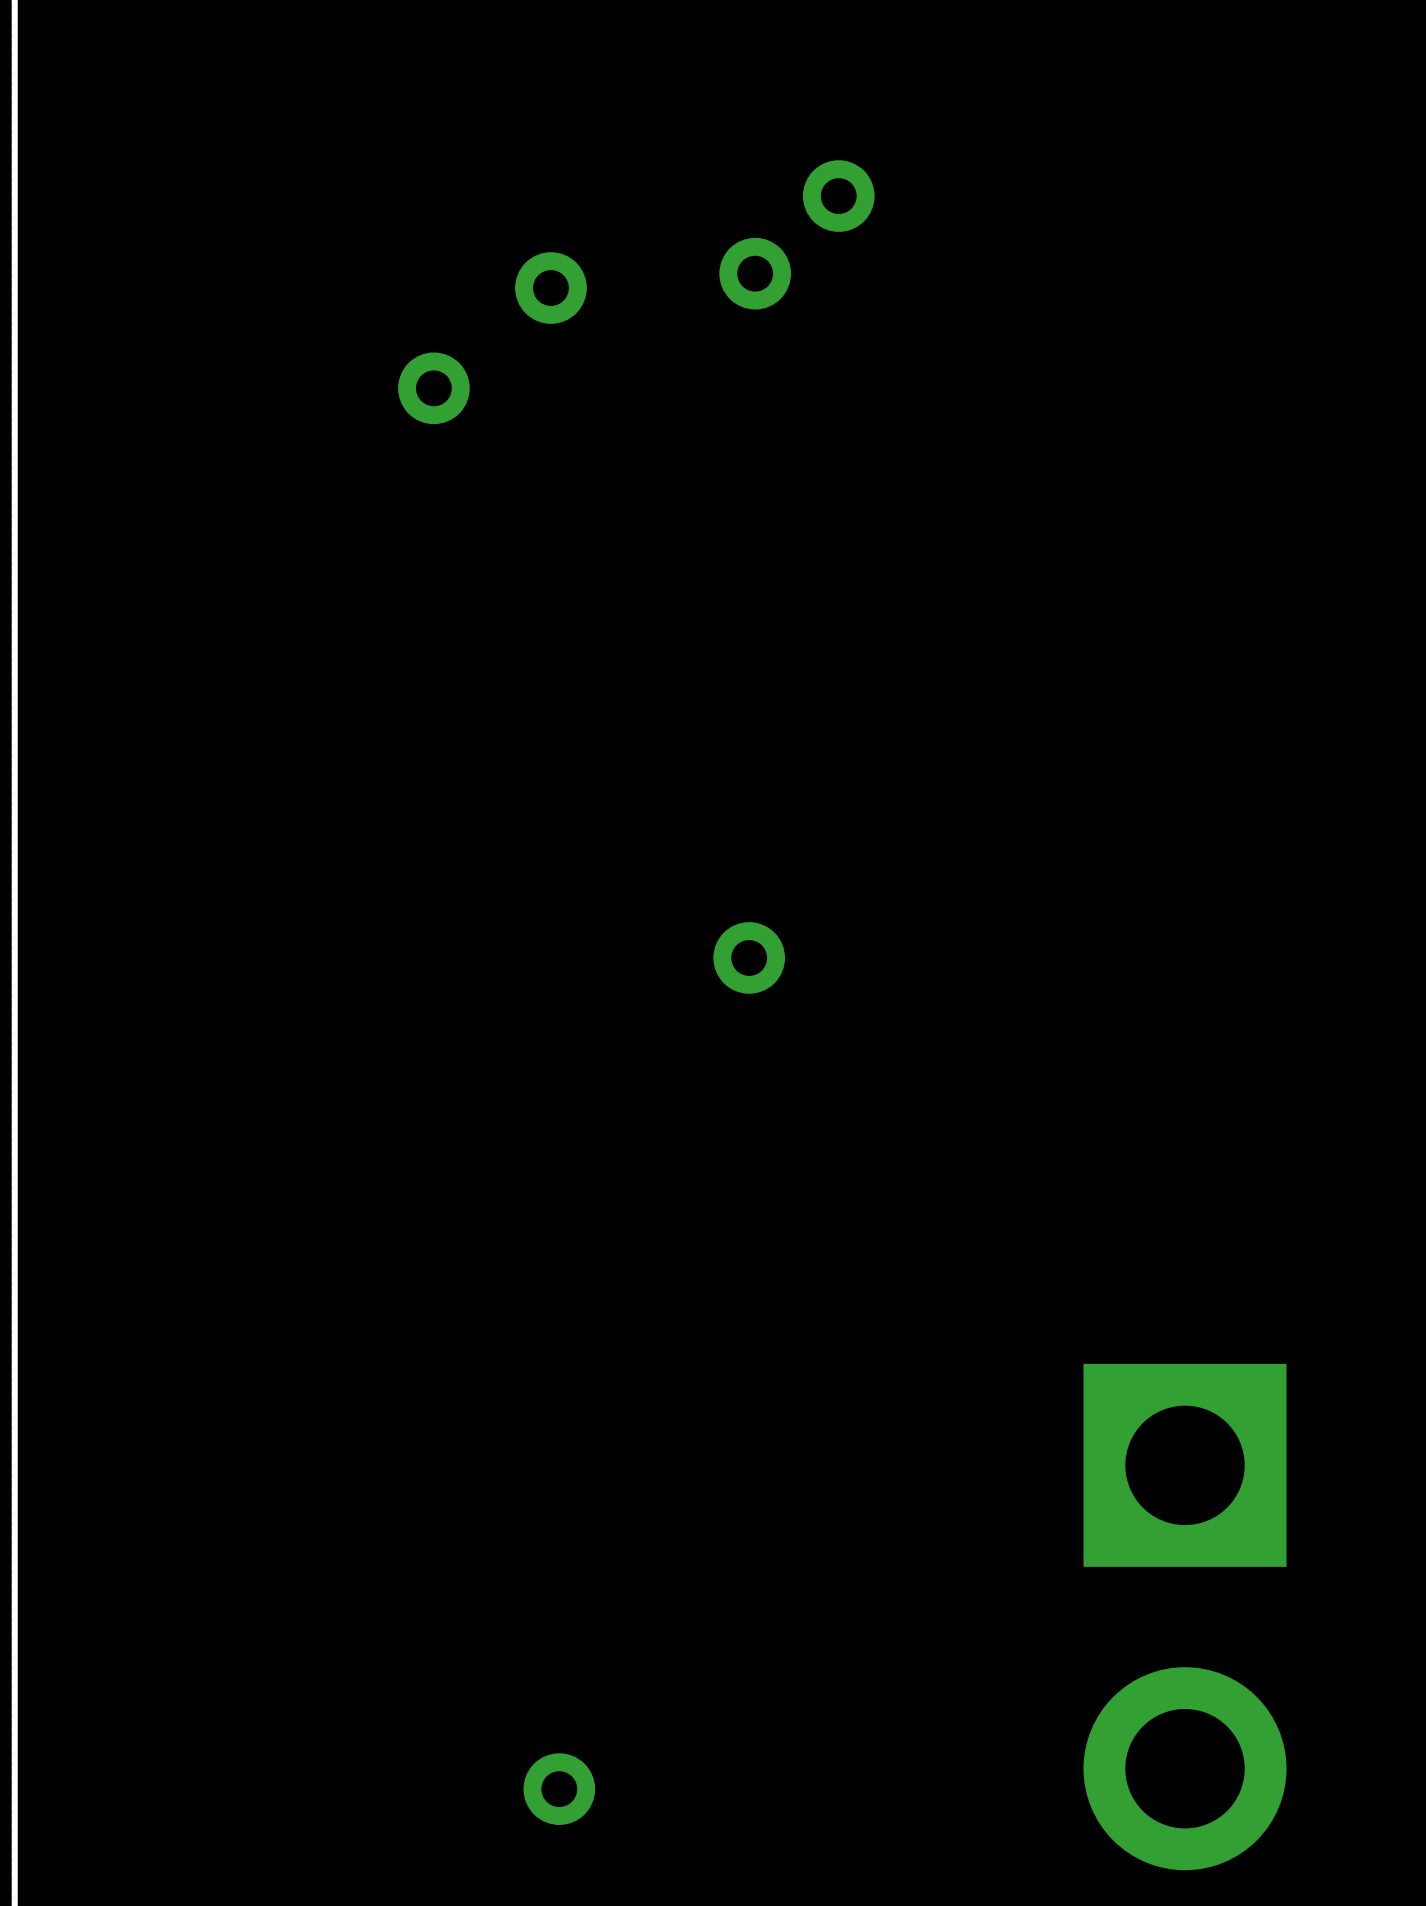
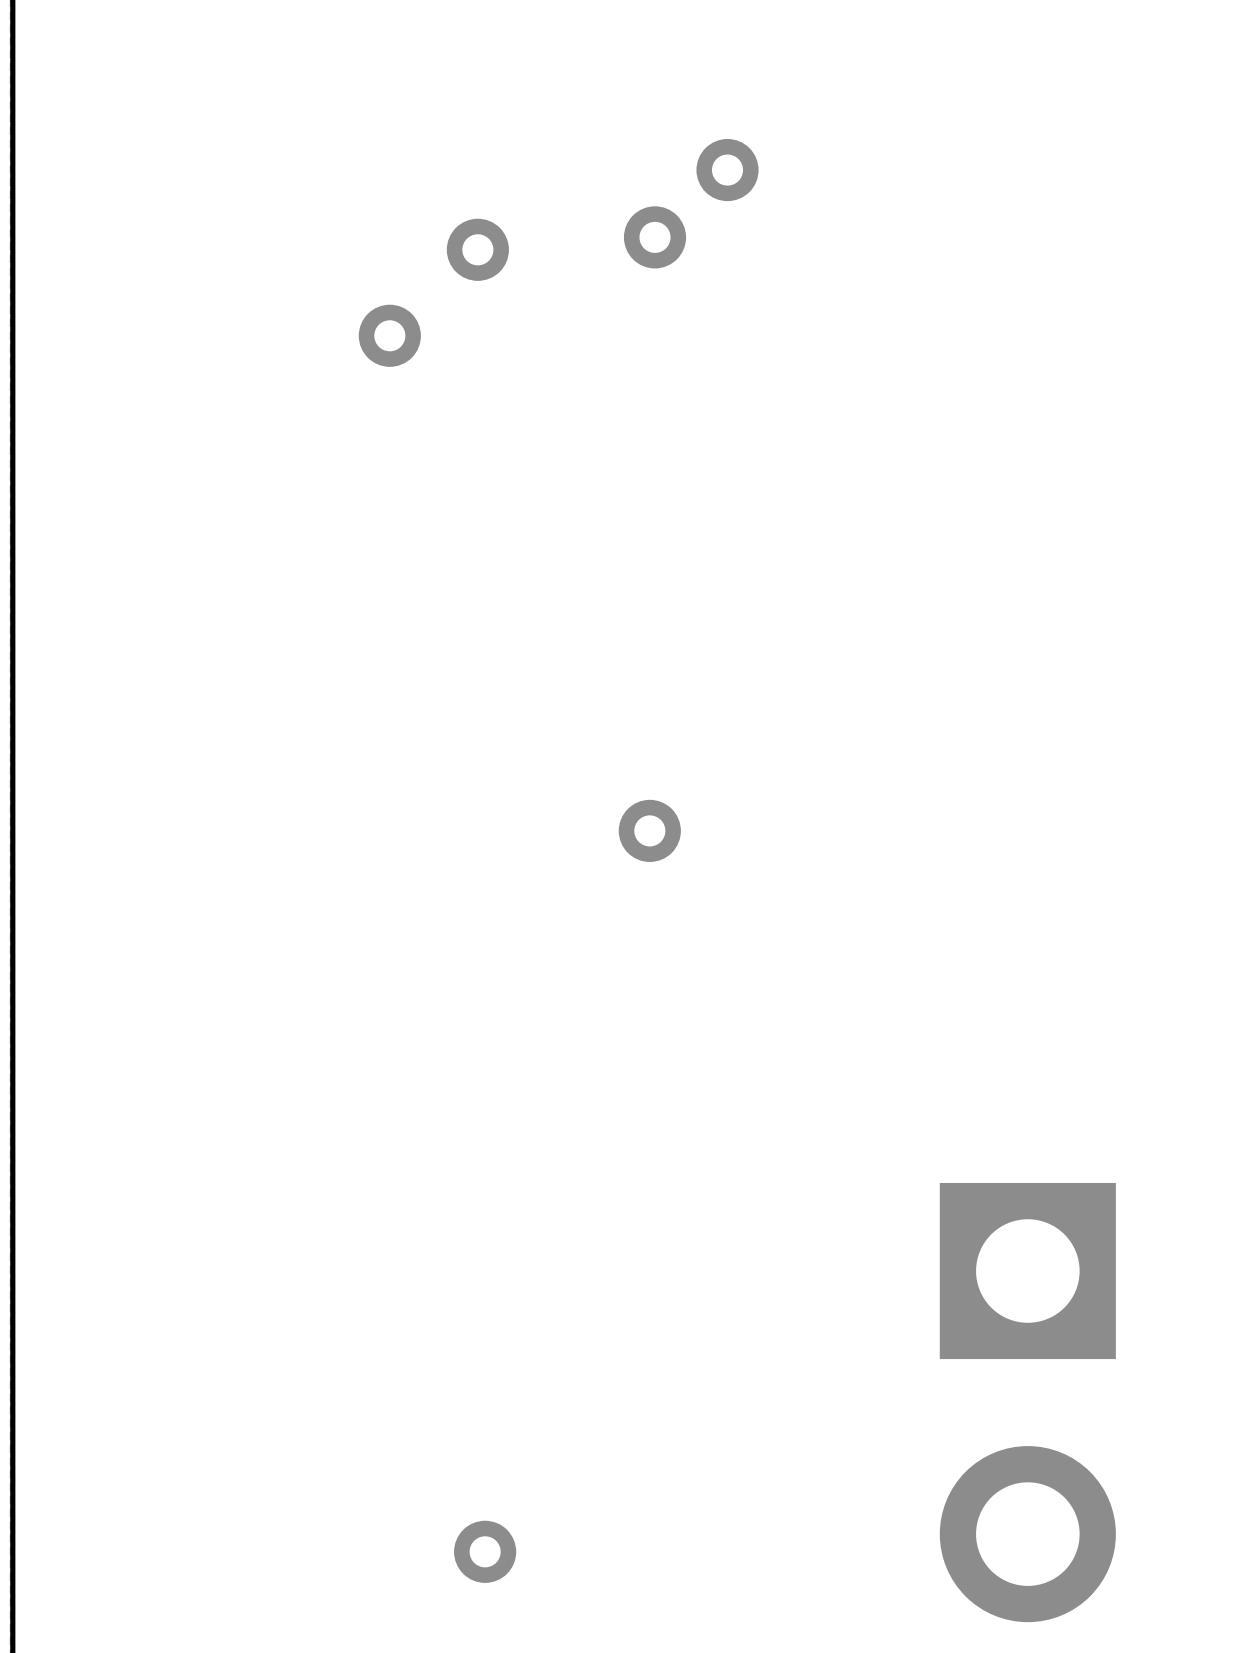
via position: (433, 388) -> (389, 335)

